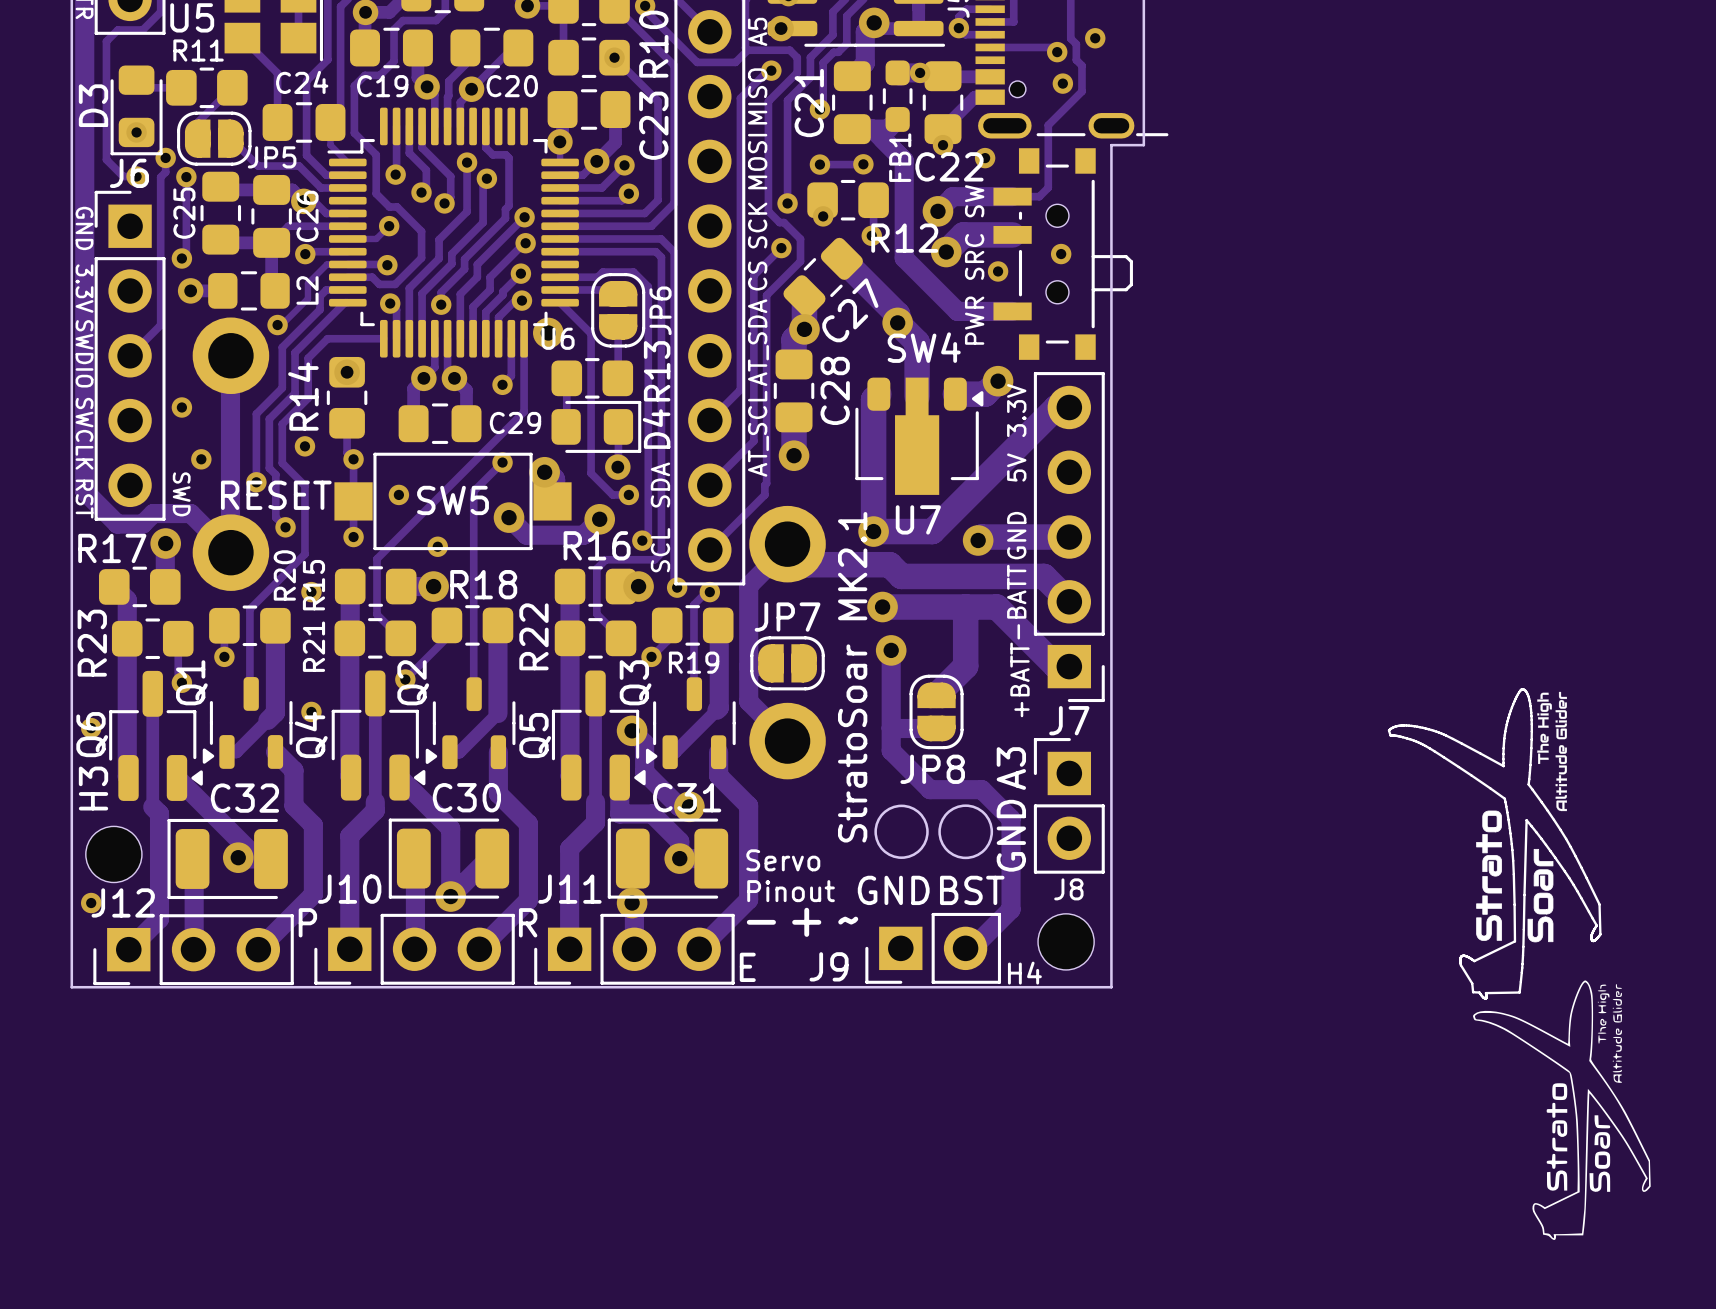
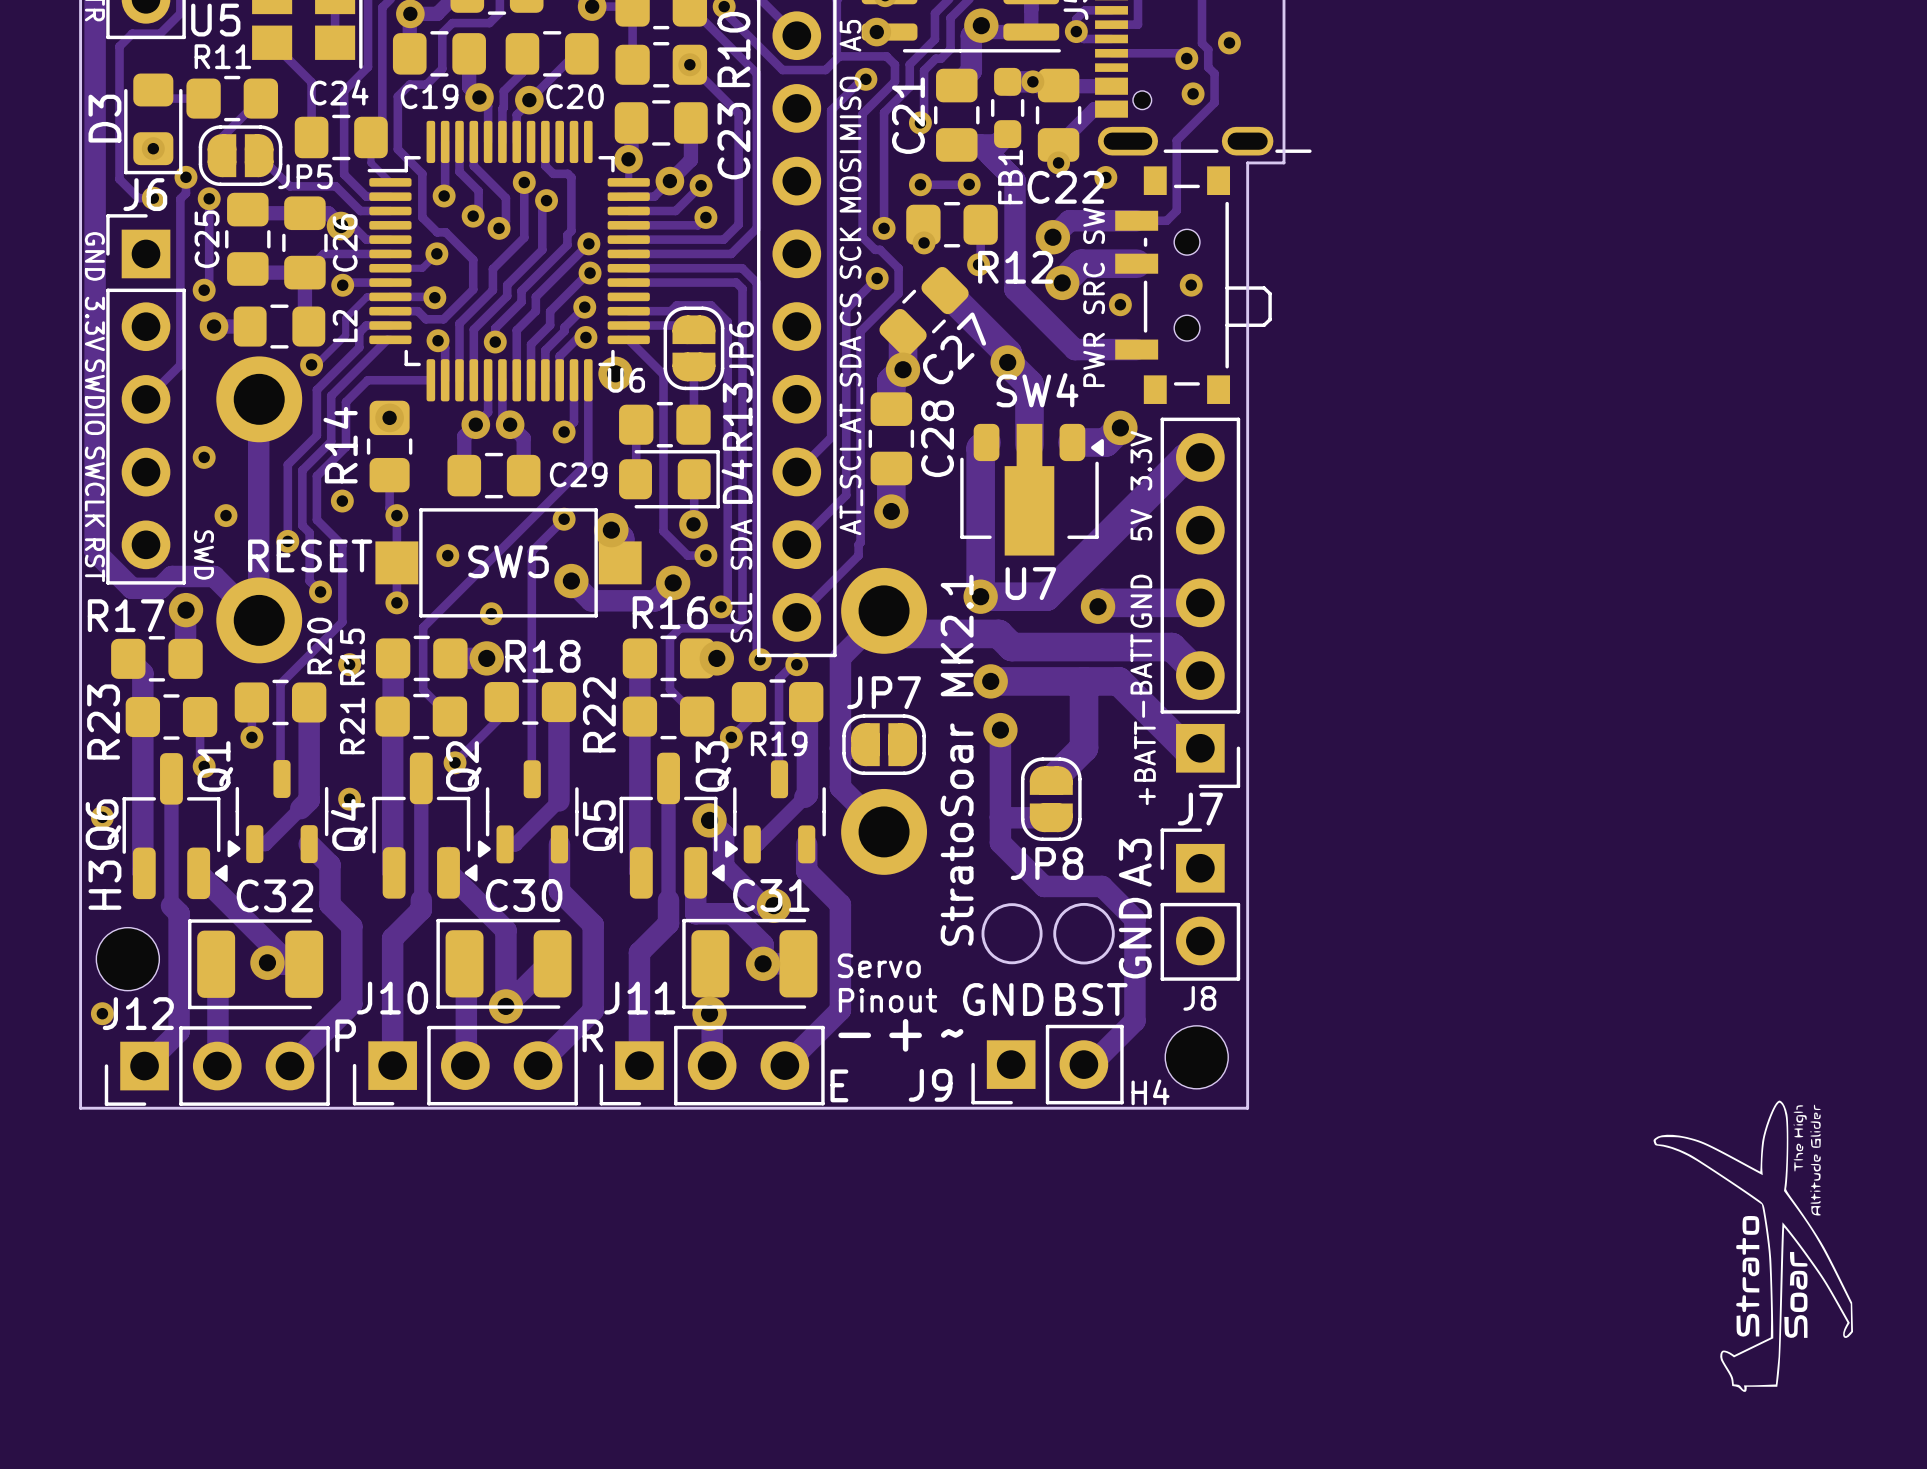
line: (1521, 689) (1514, 701) (1506, 724) (1503, 766) (1433, 730) (1404, 725) (1395, 726) (1389, 730) -> none
line: (1522, 689) (1528, 696) (1531, 716) (1528, 784) (1566, 838) (1599, 904) (1600, 934) (1595, 939) -> none
drawing: [1537, 691, 1568, 812] -> none
line: (1388, 730) (1390, 735) (1411, 739) (1429, 748) (1504, 798) (1513, 860) (1514, 941) (1474, 961) -> none
drawing: [1476, 810, 1554, 943] -> none
line: (1592, 933) (1596, 925) (1577, 891) (1526, 820) (1523, 946) (1519, 992) (1485, 993) (1486, 994) -> none
line: (1591, 935) (1591, 936) -> none
line: (1464, 955) (1473, 960) -> none
line: (1460, 958) (1460, 965) (1472, 983) (1473, 992) (1479, 992) (1482, 997) -> none

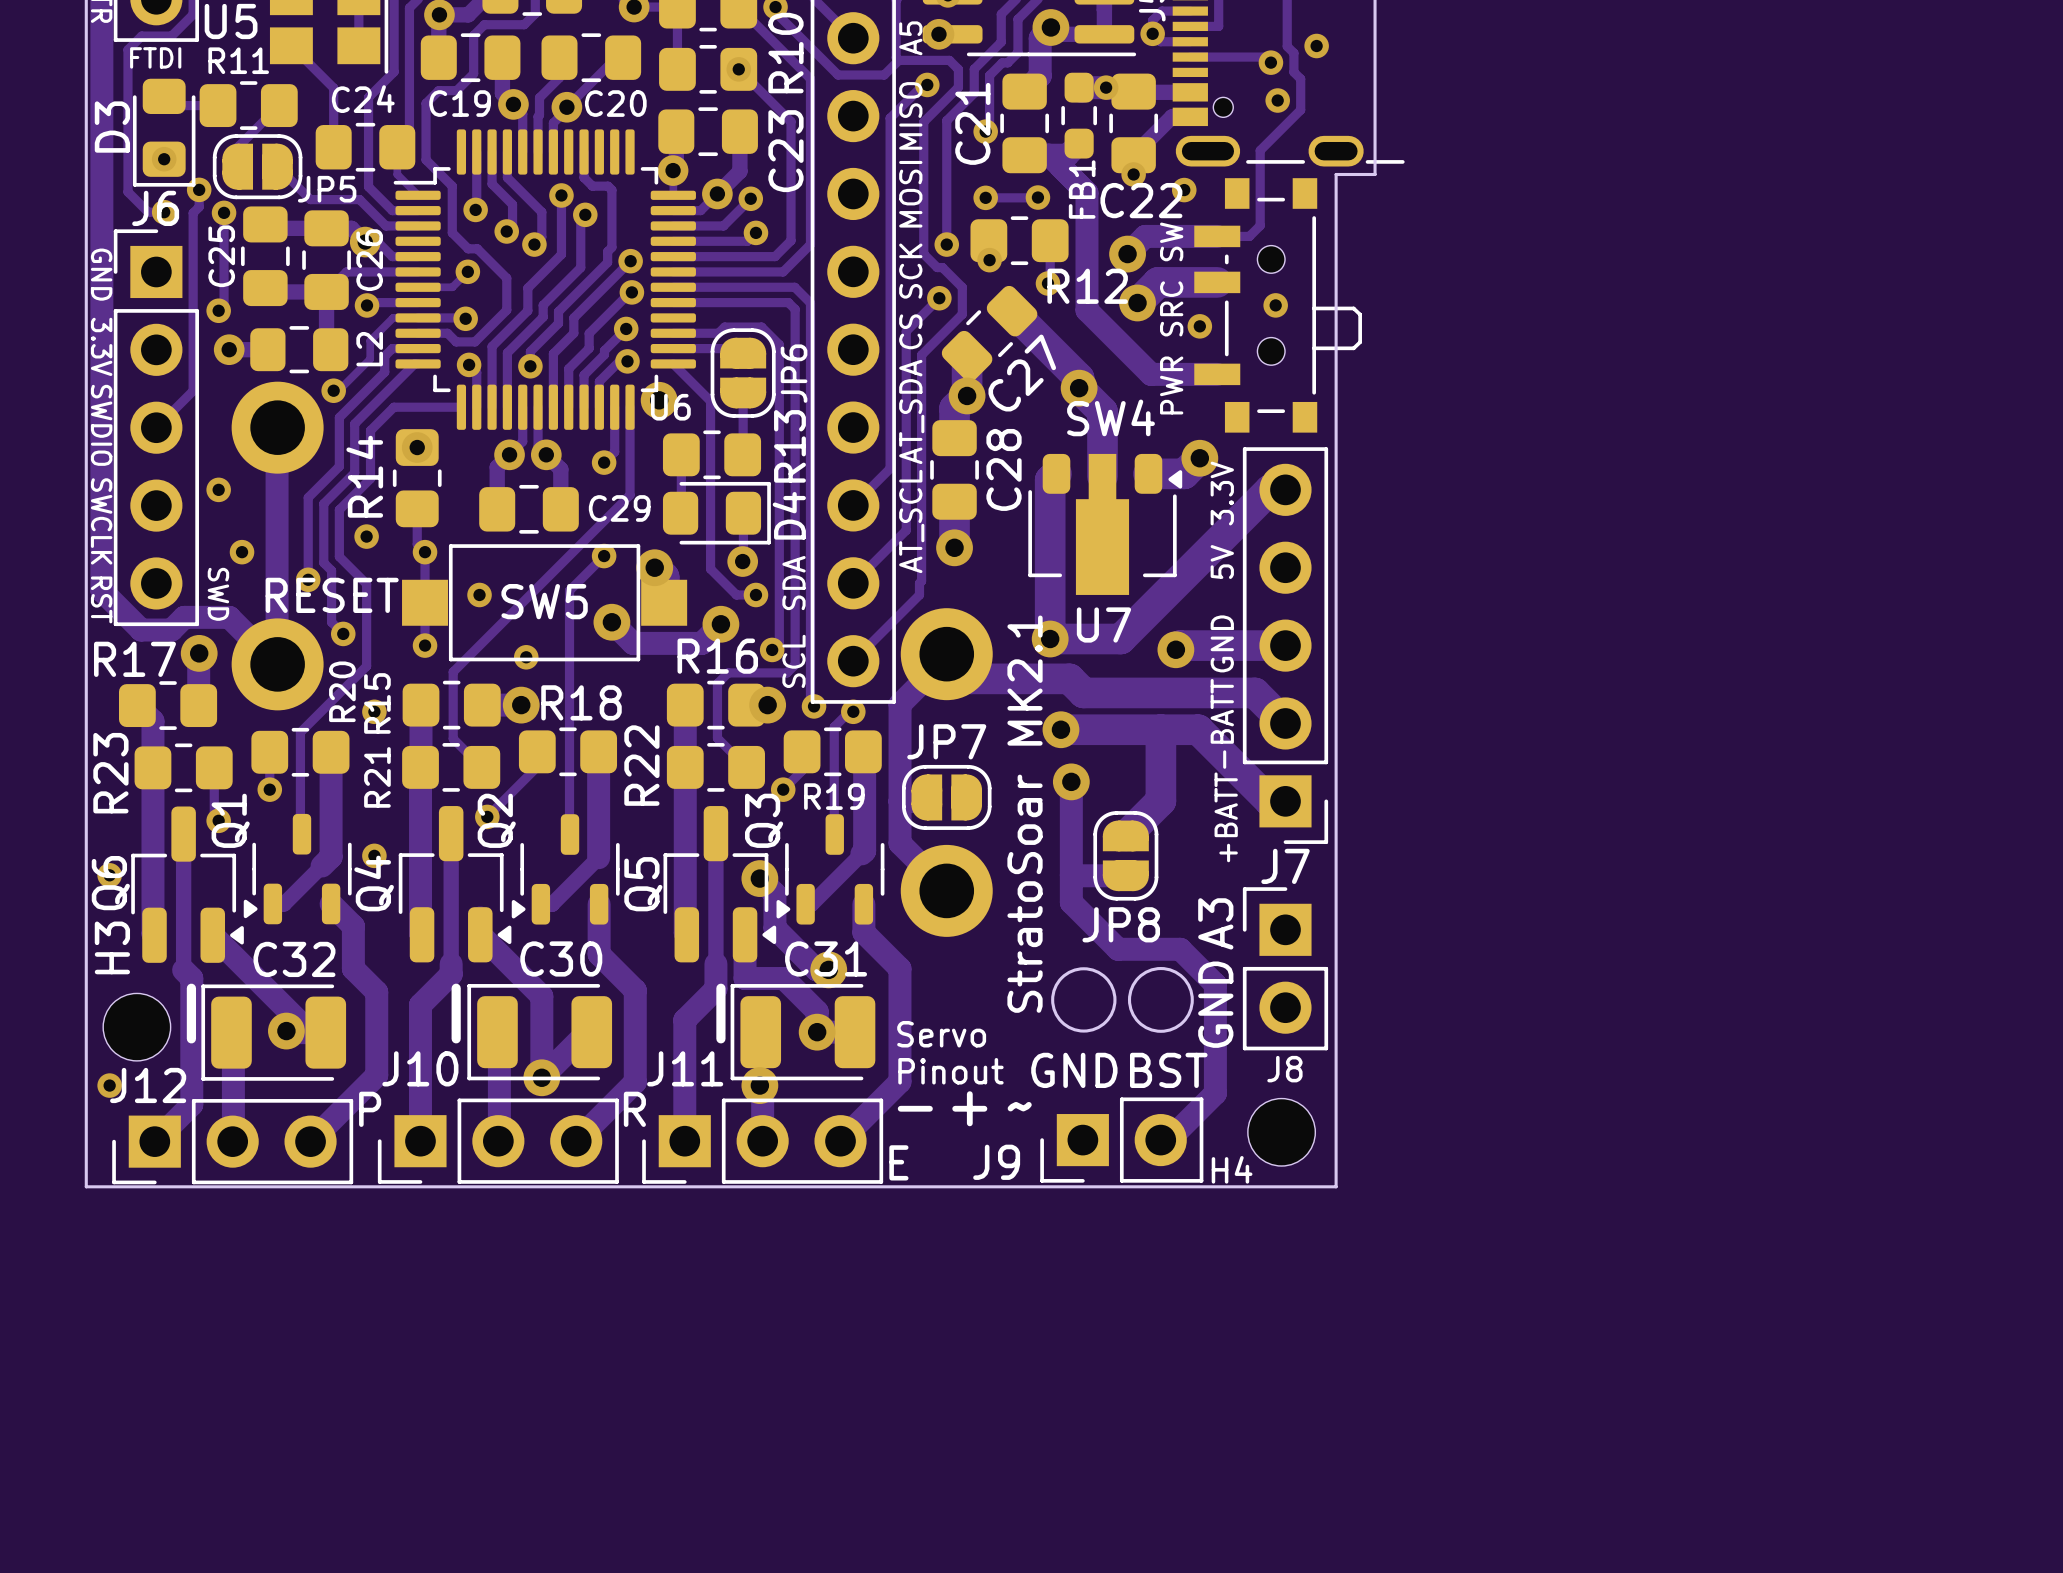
text: none -> FTDI (155, 57)
line: none -> (191, 988) (191, 1038)
line: none -> (456, 988) (456, 1038)
line: none -> (720, 988) (720, 1038)
drawing: [1653, 1100, 1854, 1392] -> none

